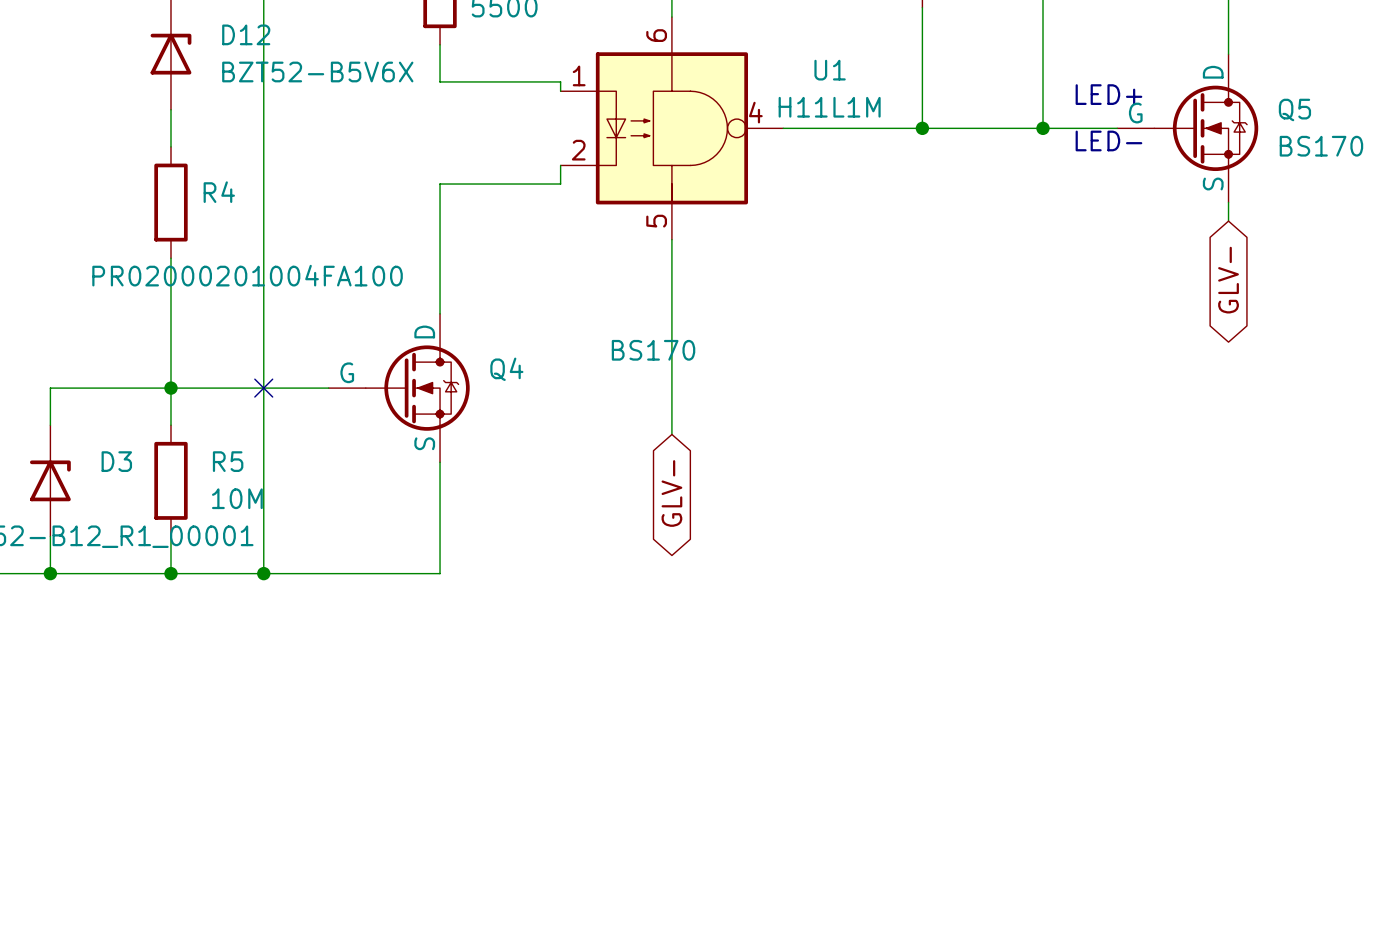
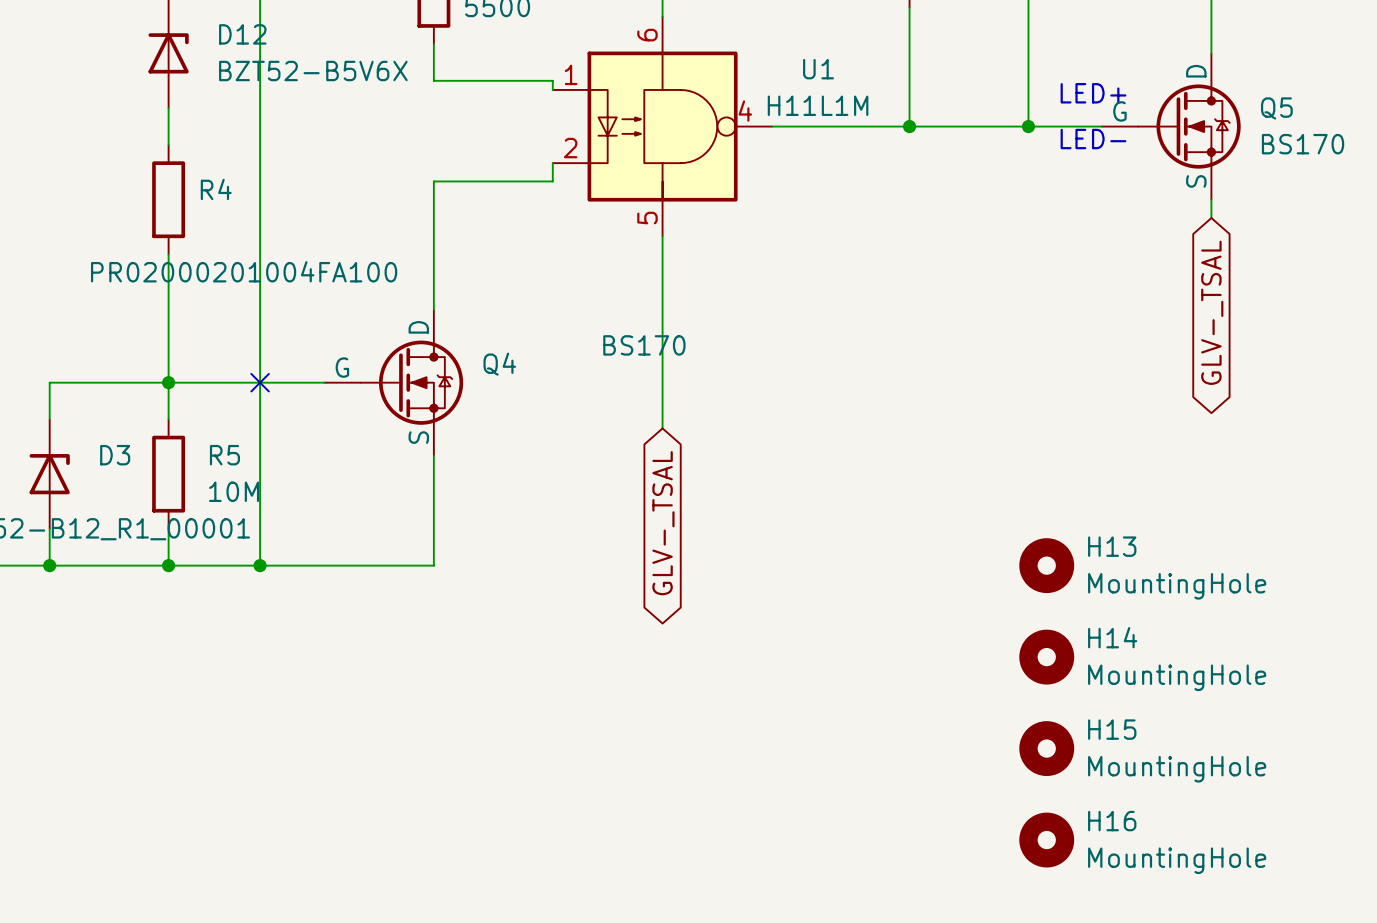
global label: GLV- (1228, 280) -> GLV-_TSAL (1212, 312)
global label: GLV- (671, 493) -> GLV-_TSAL (663, 523)
H13: none -> MountingHole (1046, 565)
H14: none -> MountingHole (1046, 657)
H15: none -> MountingHole (1046, 748)
H16: none -> MountingHole (1046, 840)

